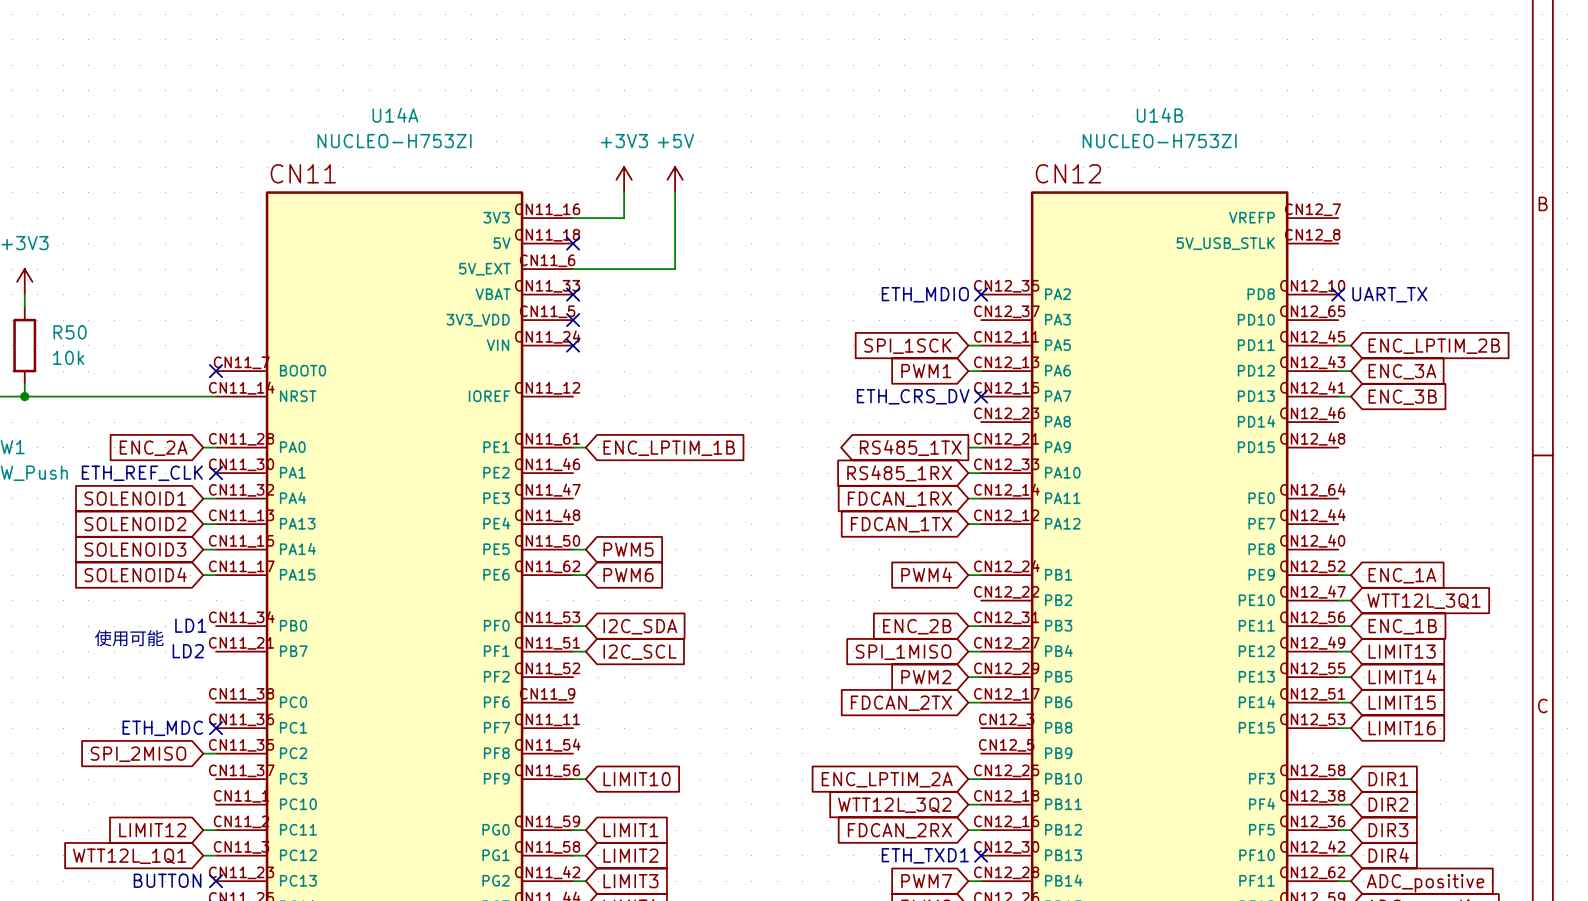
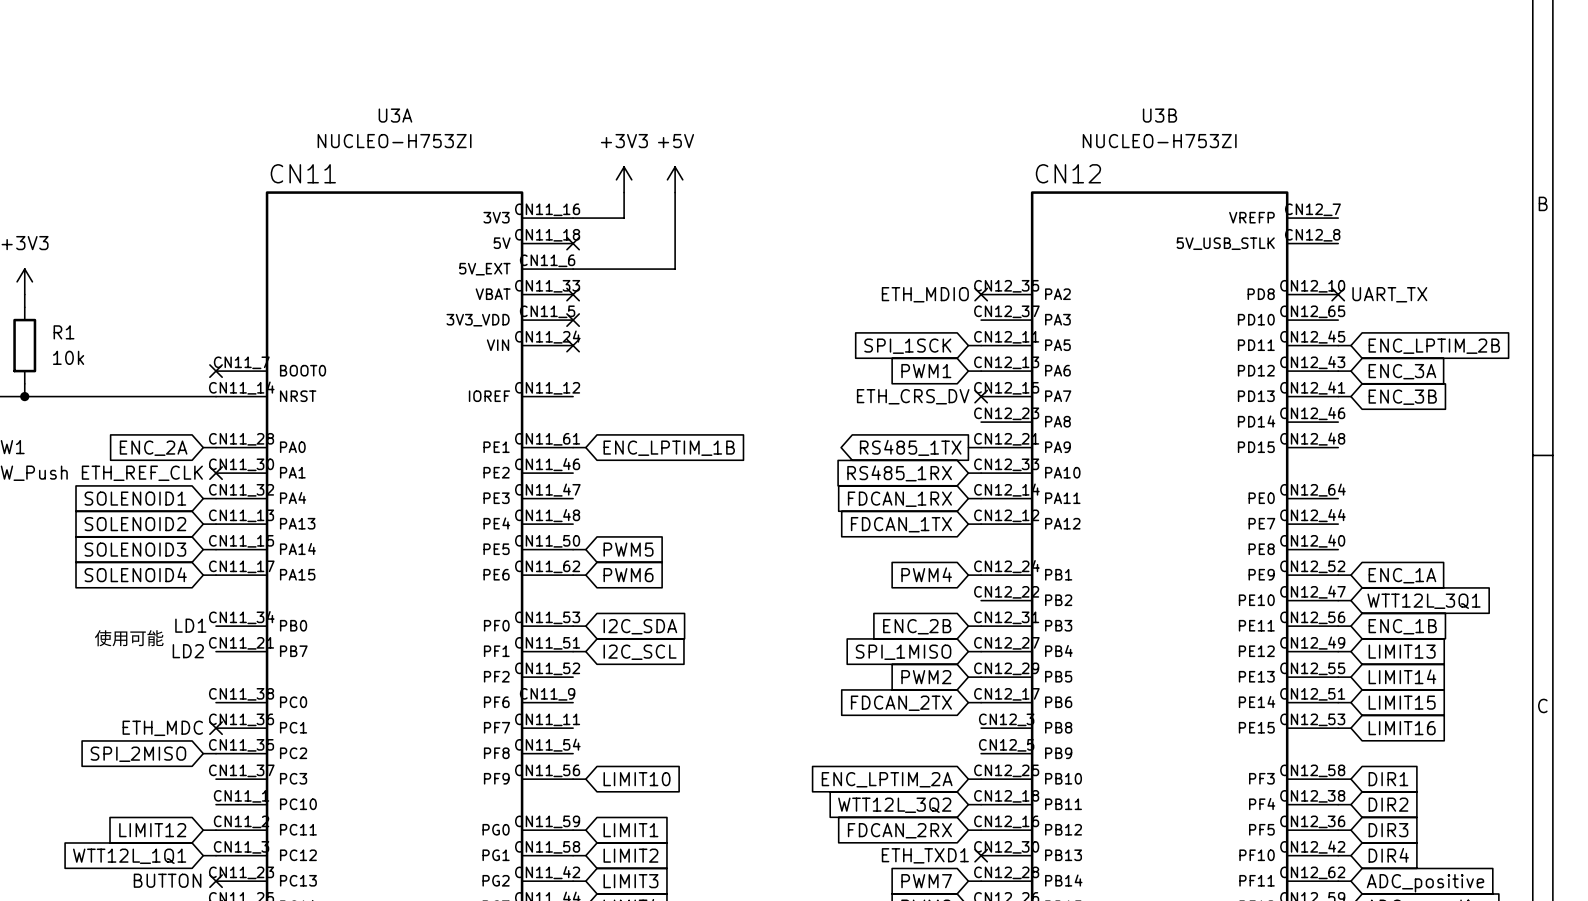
U14A name: U14A (395, 115) -> U3A (395, 115)
U14B name: U14B (1159, 115) -> U3B (1159, 115)
R50 name: R50 (70, 332) -> R1 (64, 332)

